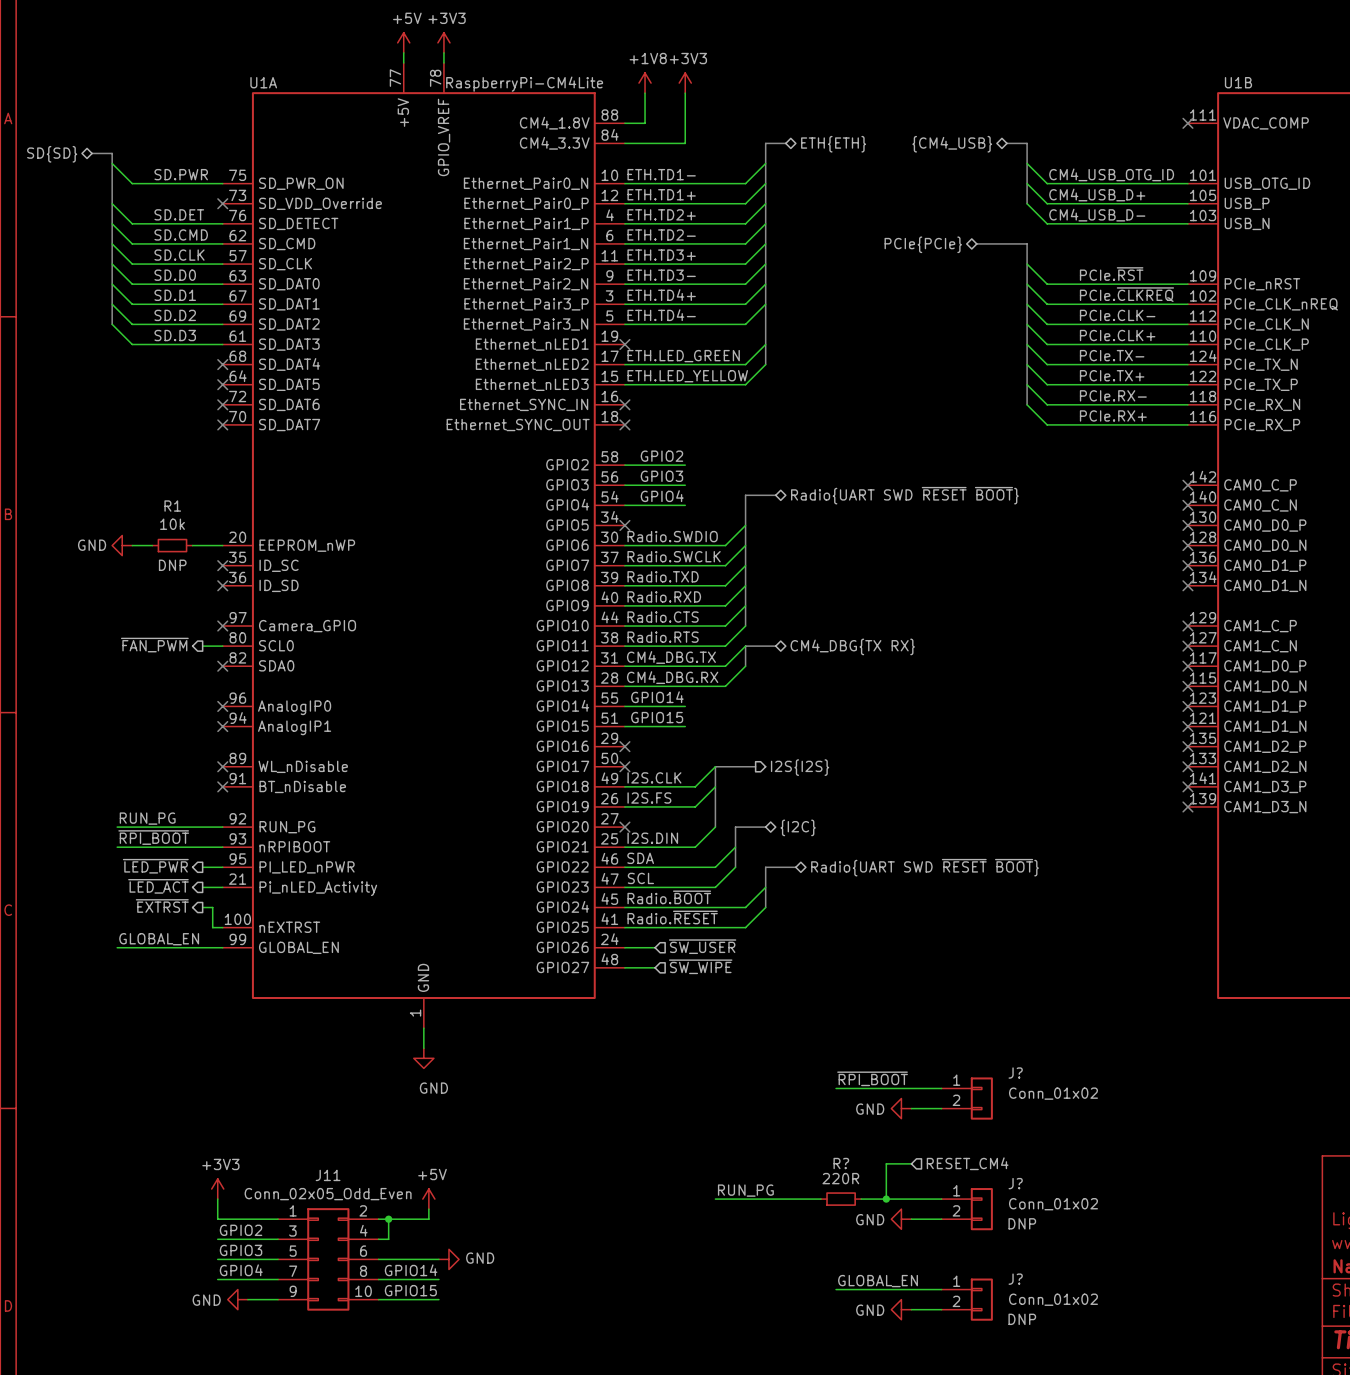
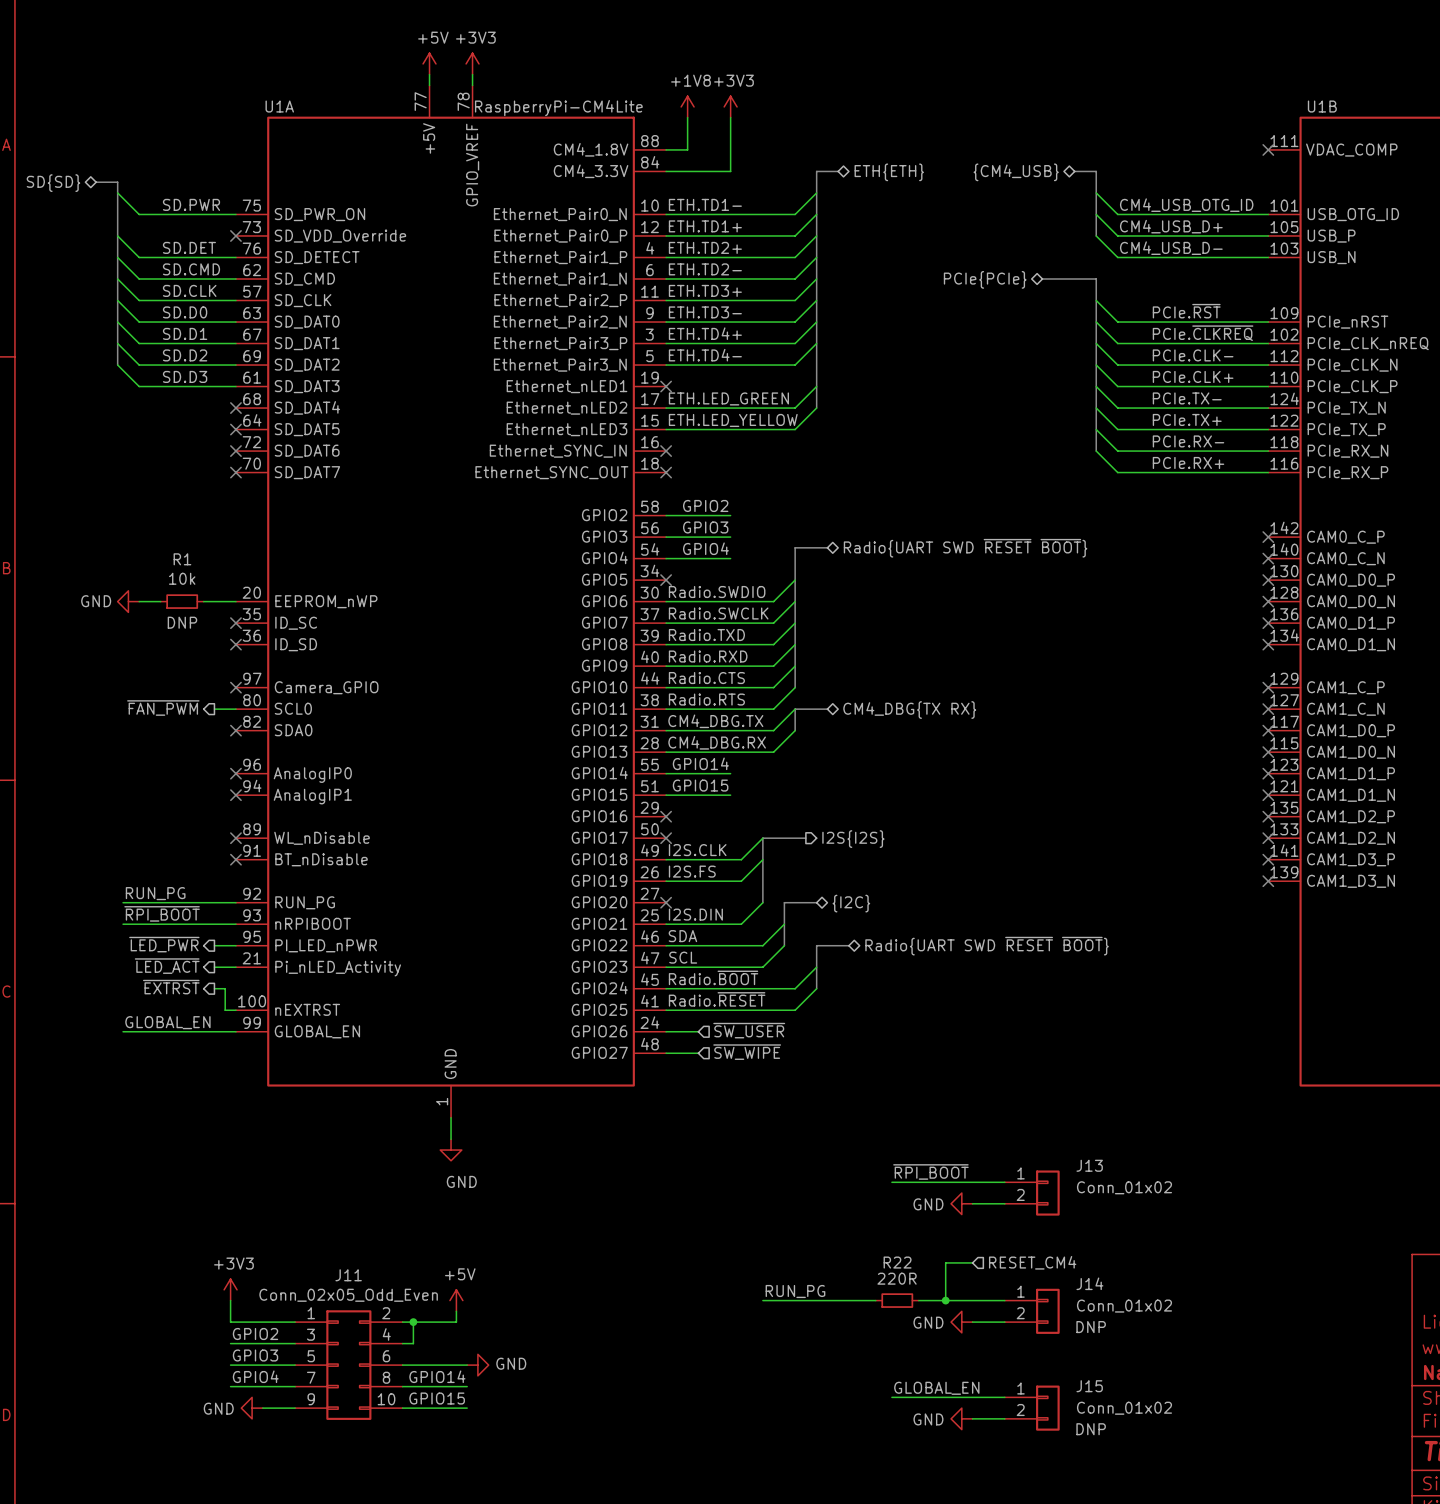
J? name: J? (1015, 1073) -> J13 (1089, 1165)
R? name: R? (841, 1163) -> R22 (897, 1262)
J? name: J? (1015, 1183) -> J14 (1089, 1283)
J? name: J? (1015, 1279) -> J15 (1089, 1386)

